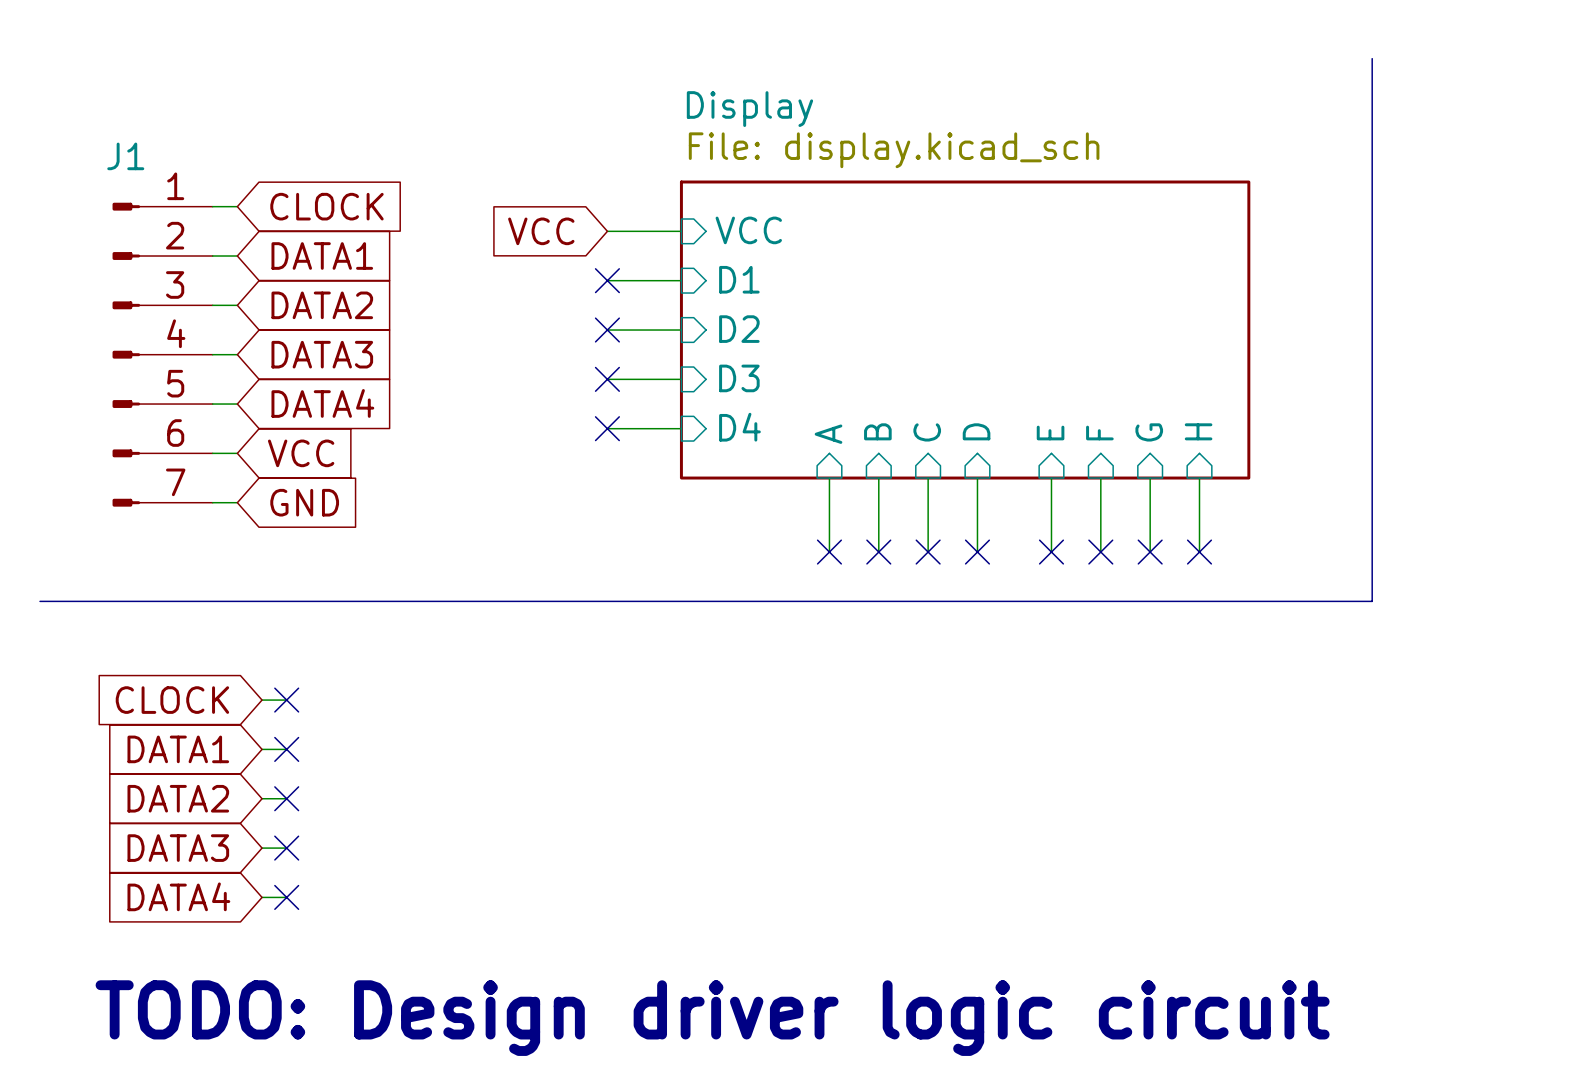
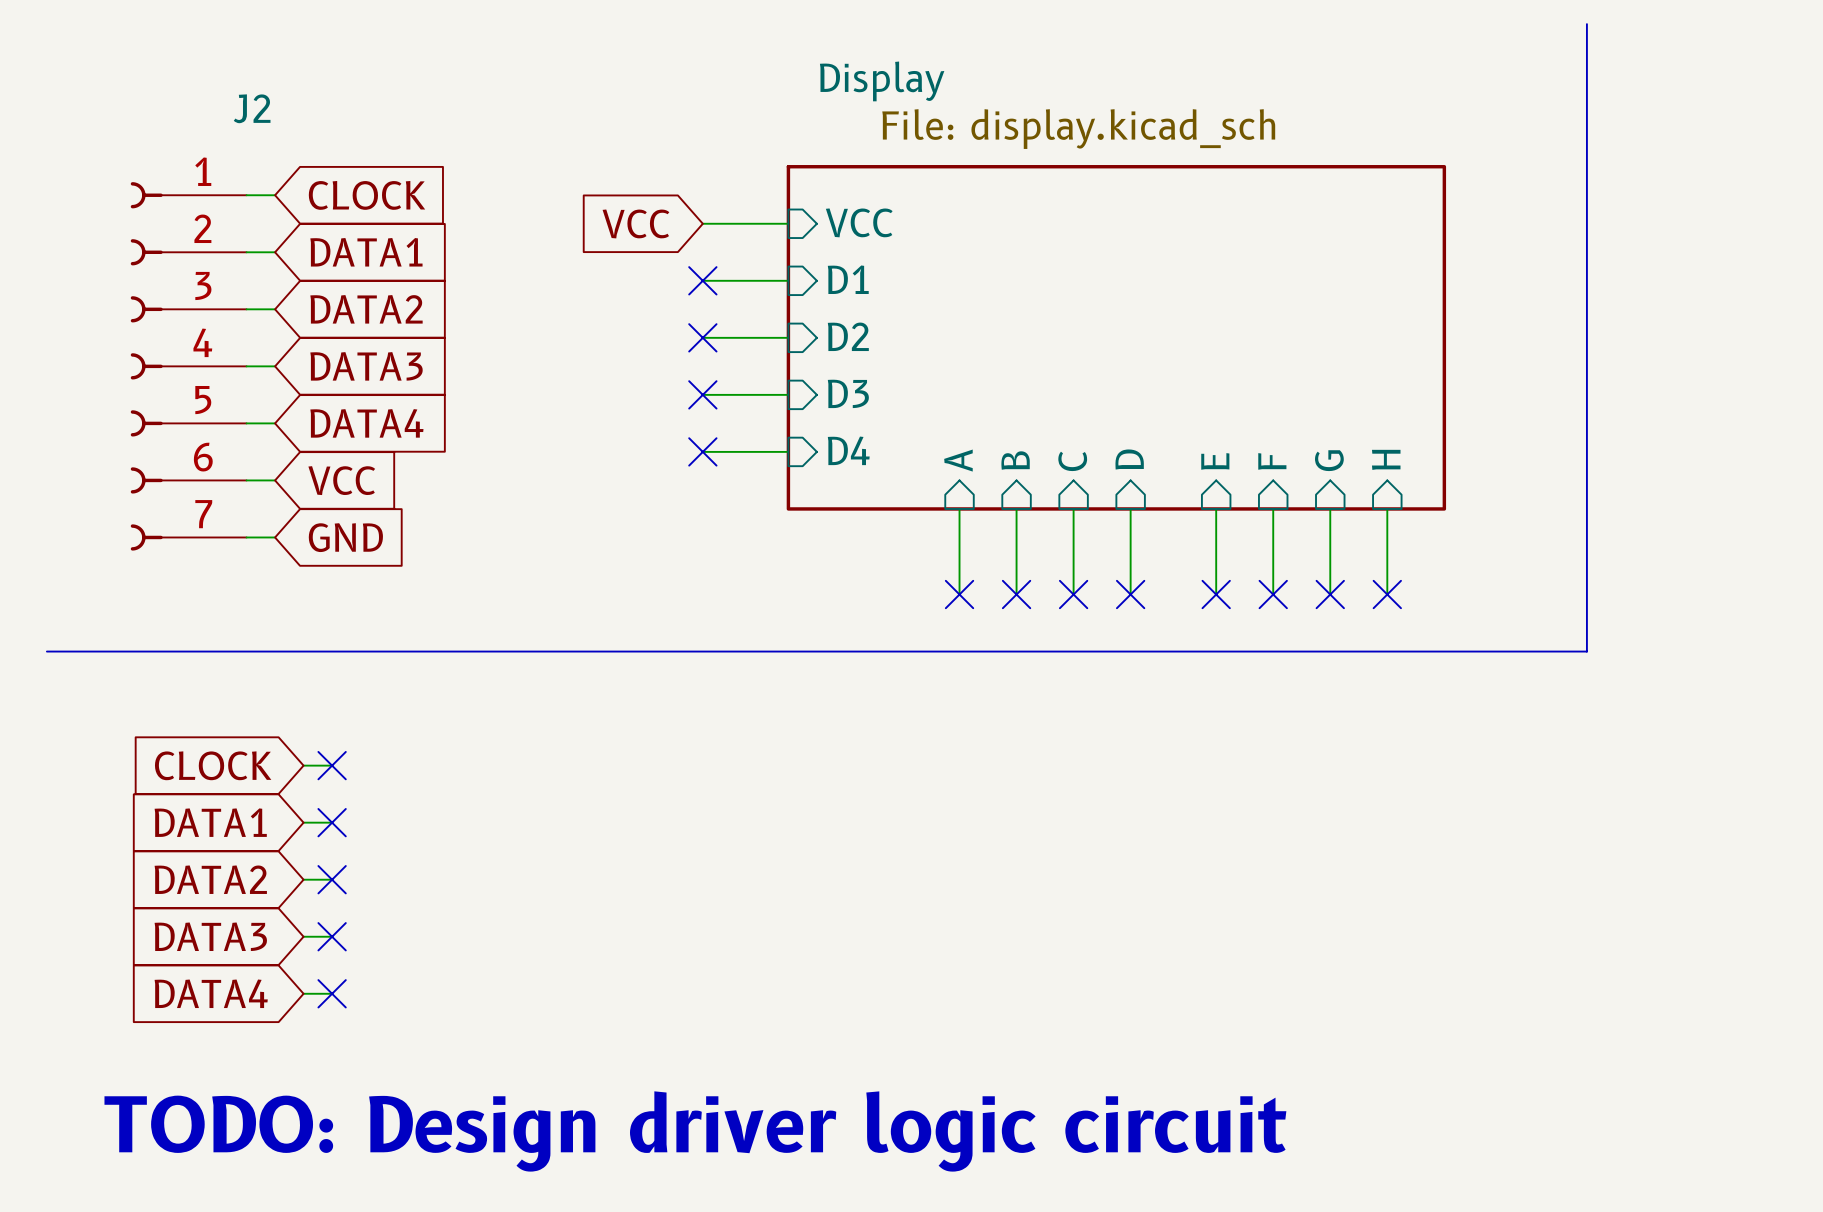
J1: (162, 354) -> none
J2: none -> (188, 366)

